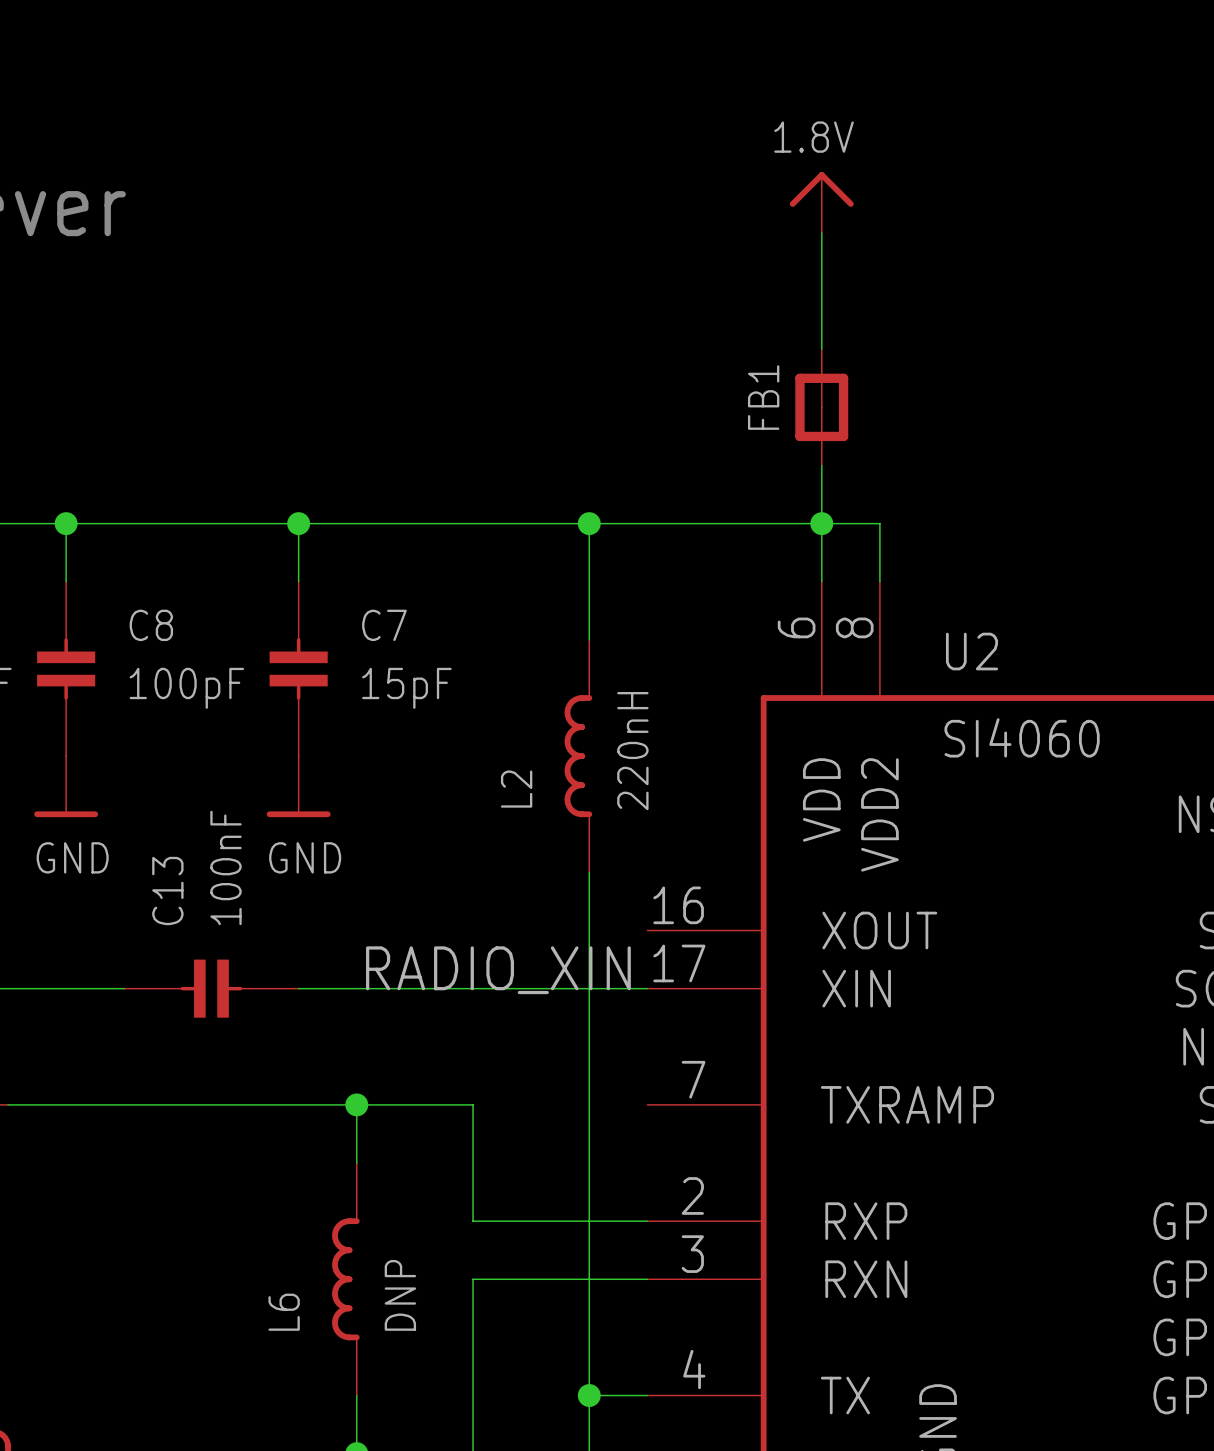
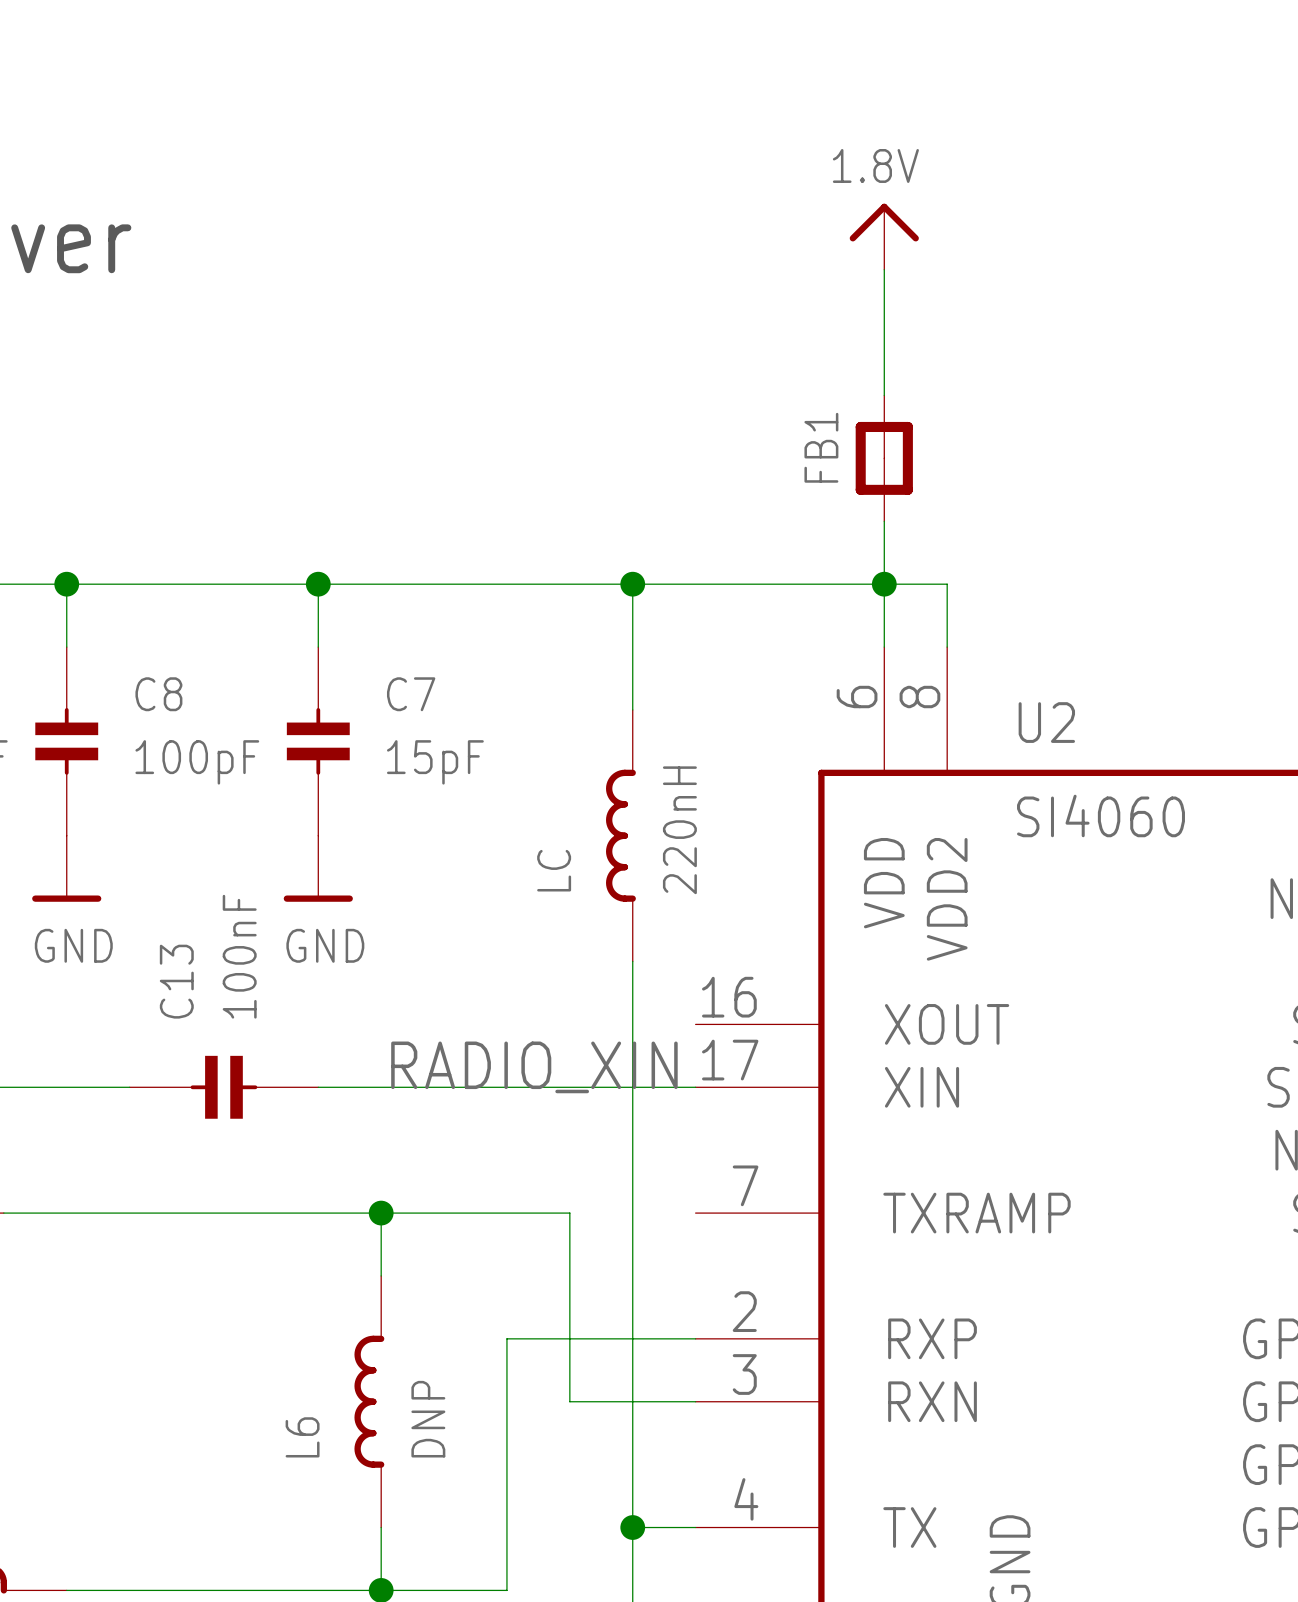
L2 name: L2 (516, 789) -> LC (554, 870)
wire: (473, 1104) (473, 1221) -> (506, 1213) (569, 1213) (569, 1401)
wire: (473, 1279) (531, 1279) -> (506, 1401) (506, 1338)

